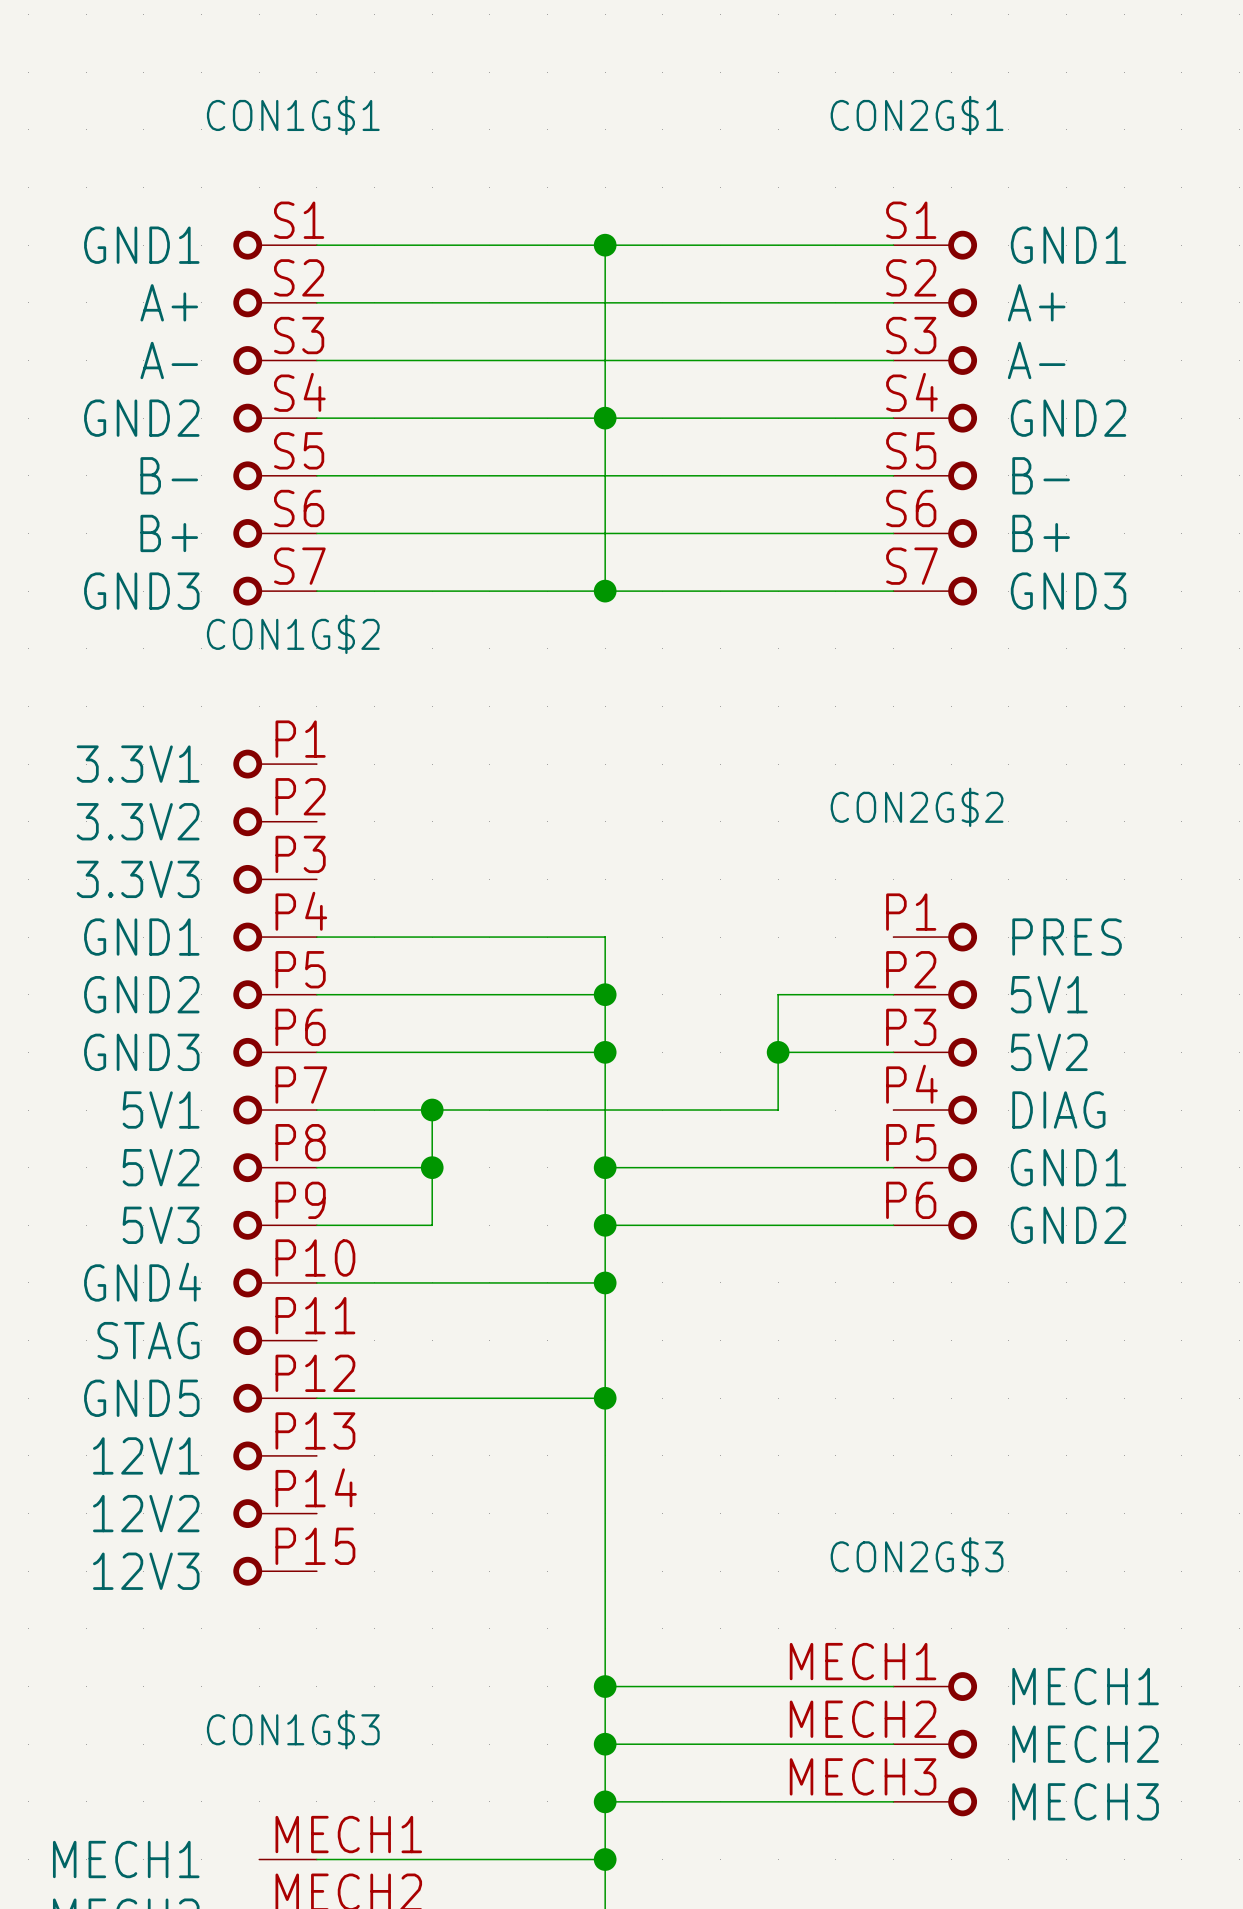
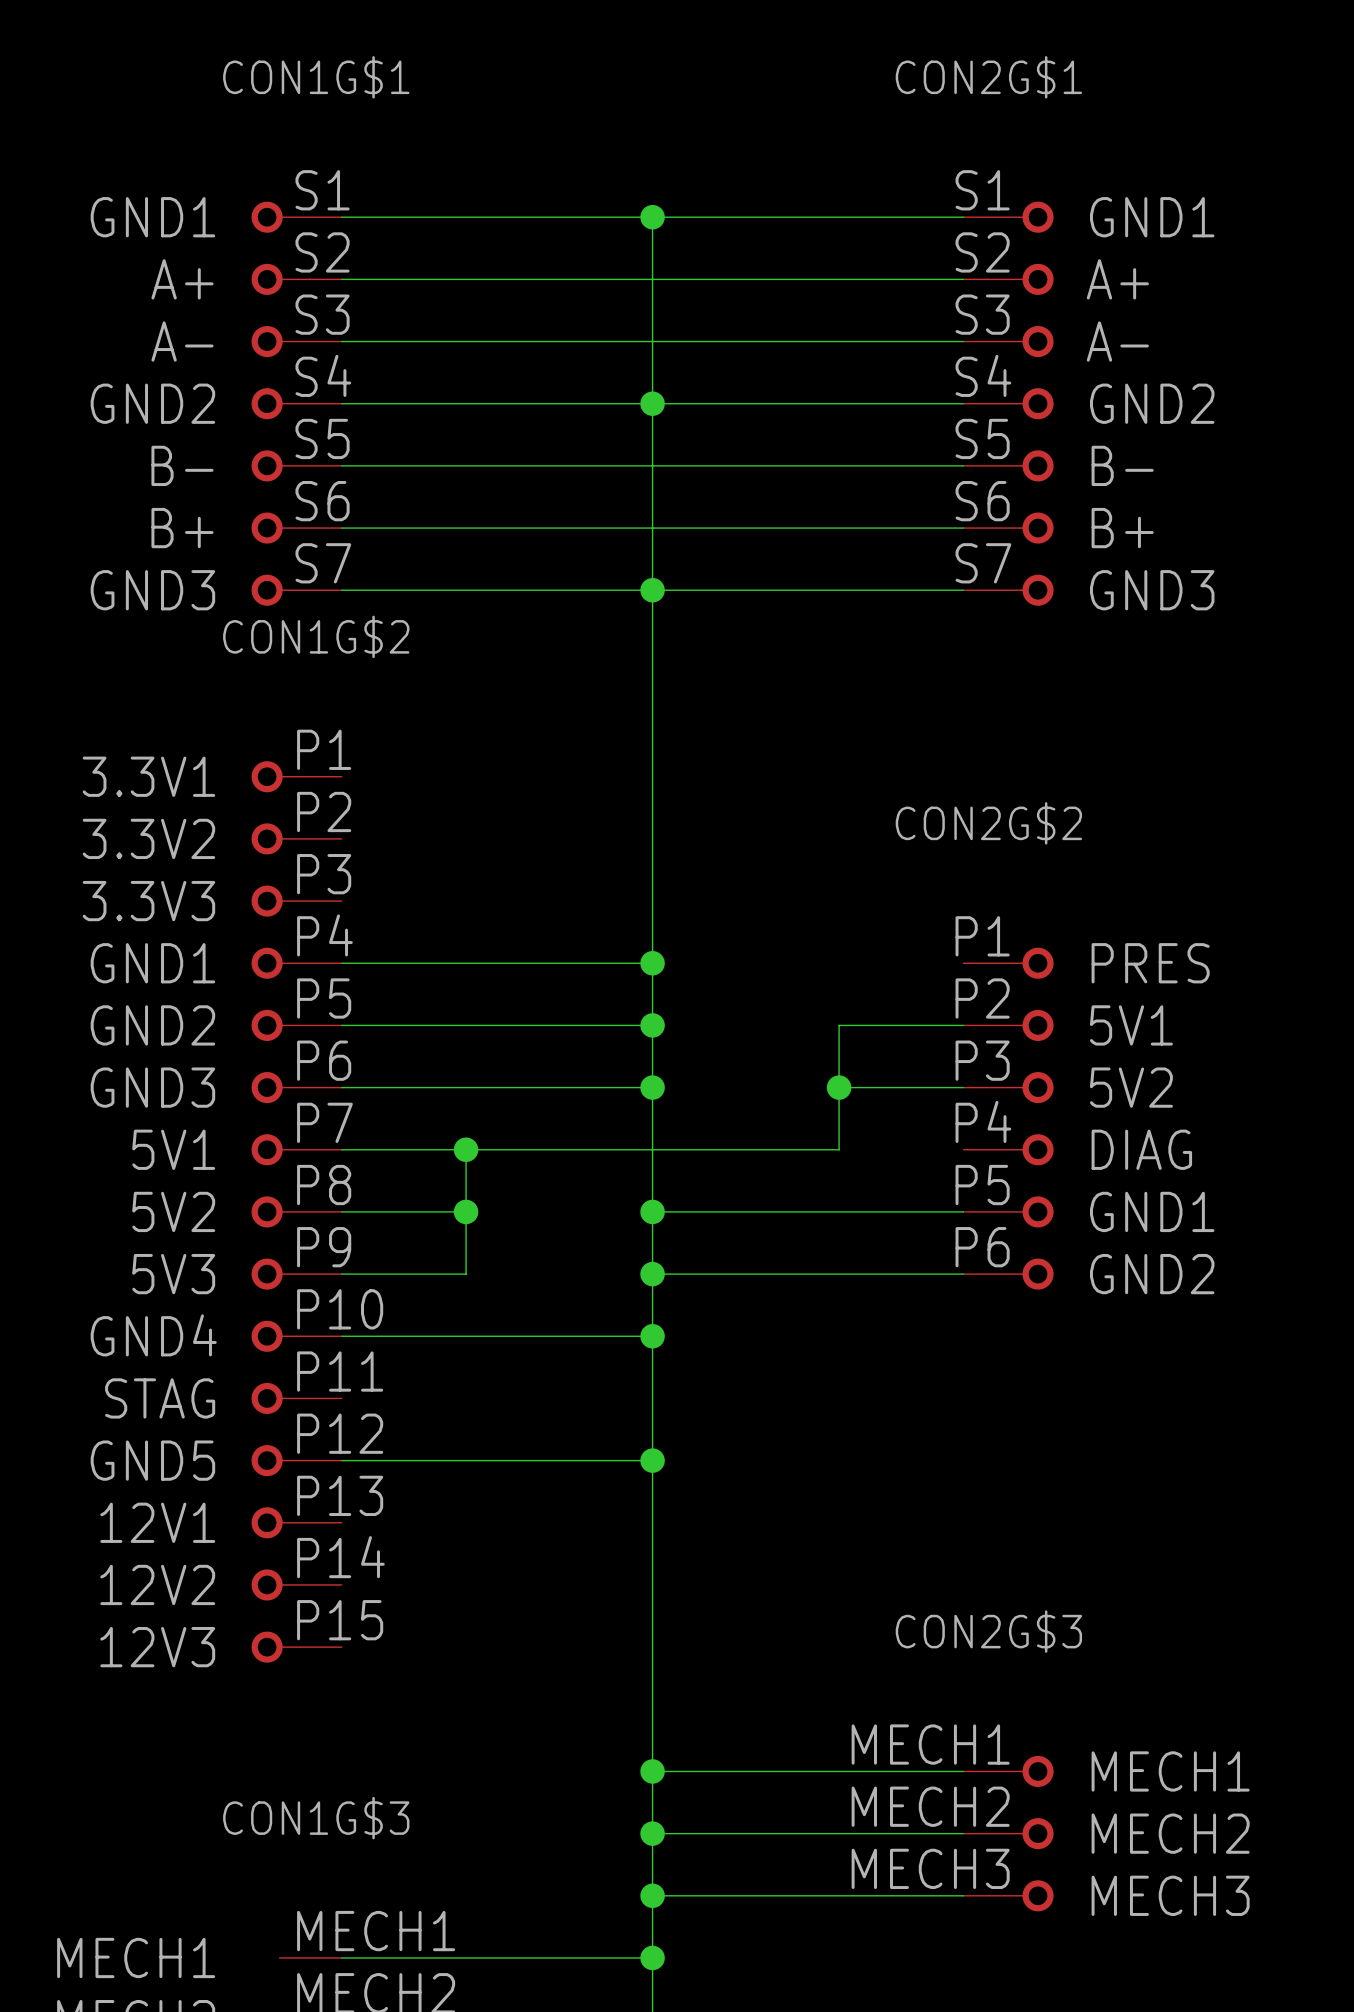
wire: none -> (652, 590) (652, 963)
junction: none -> (652, 963)

